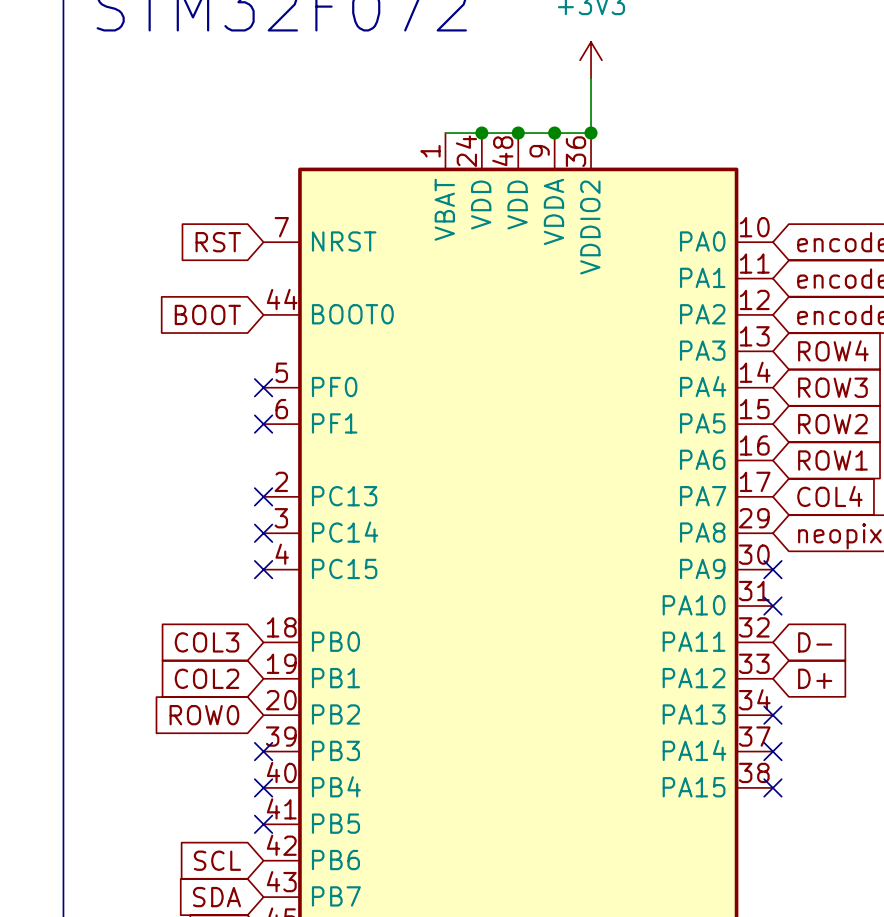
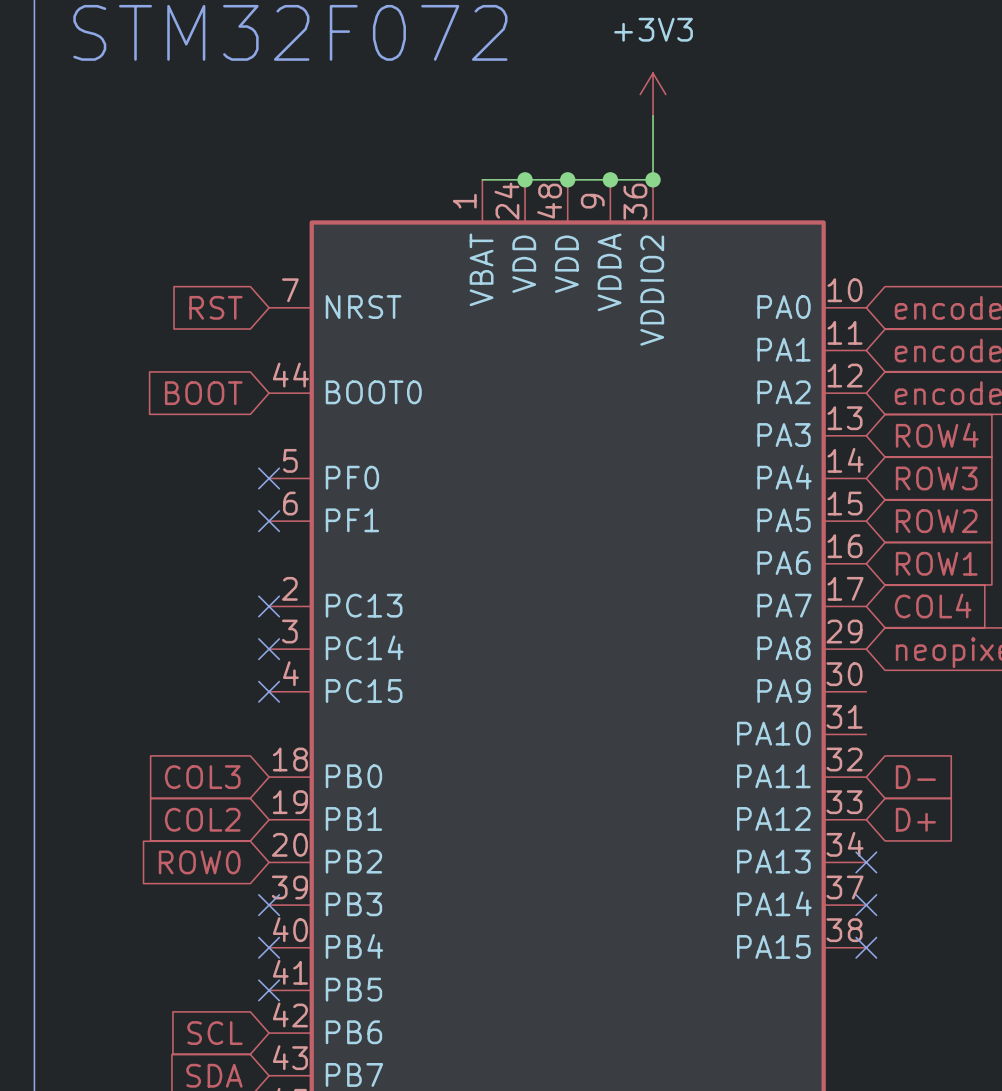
no-connect mark: (772, 569) -> none
no-connect mark: (772, 606) -> none

